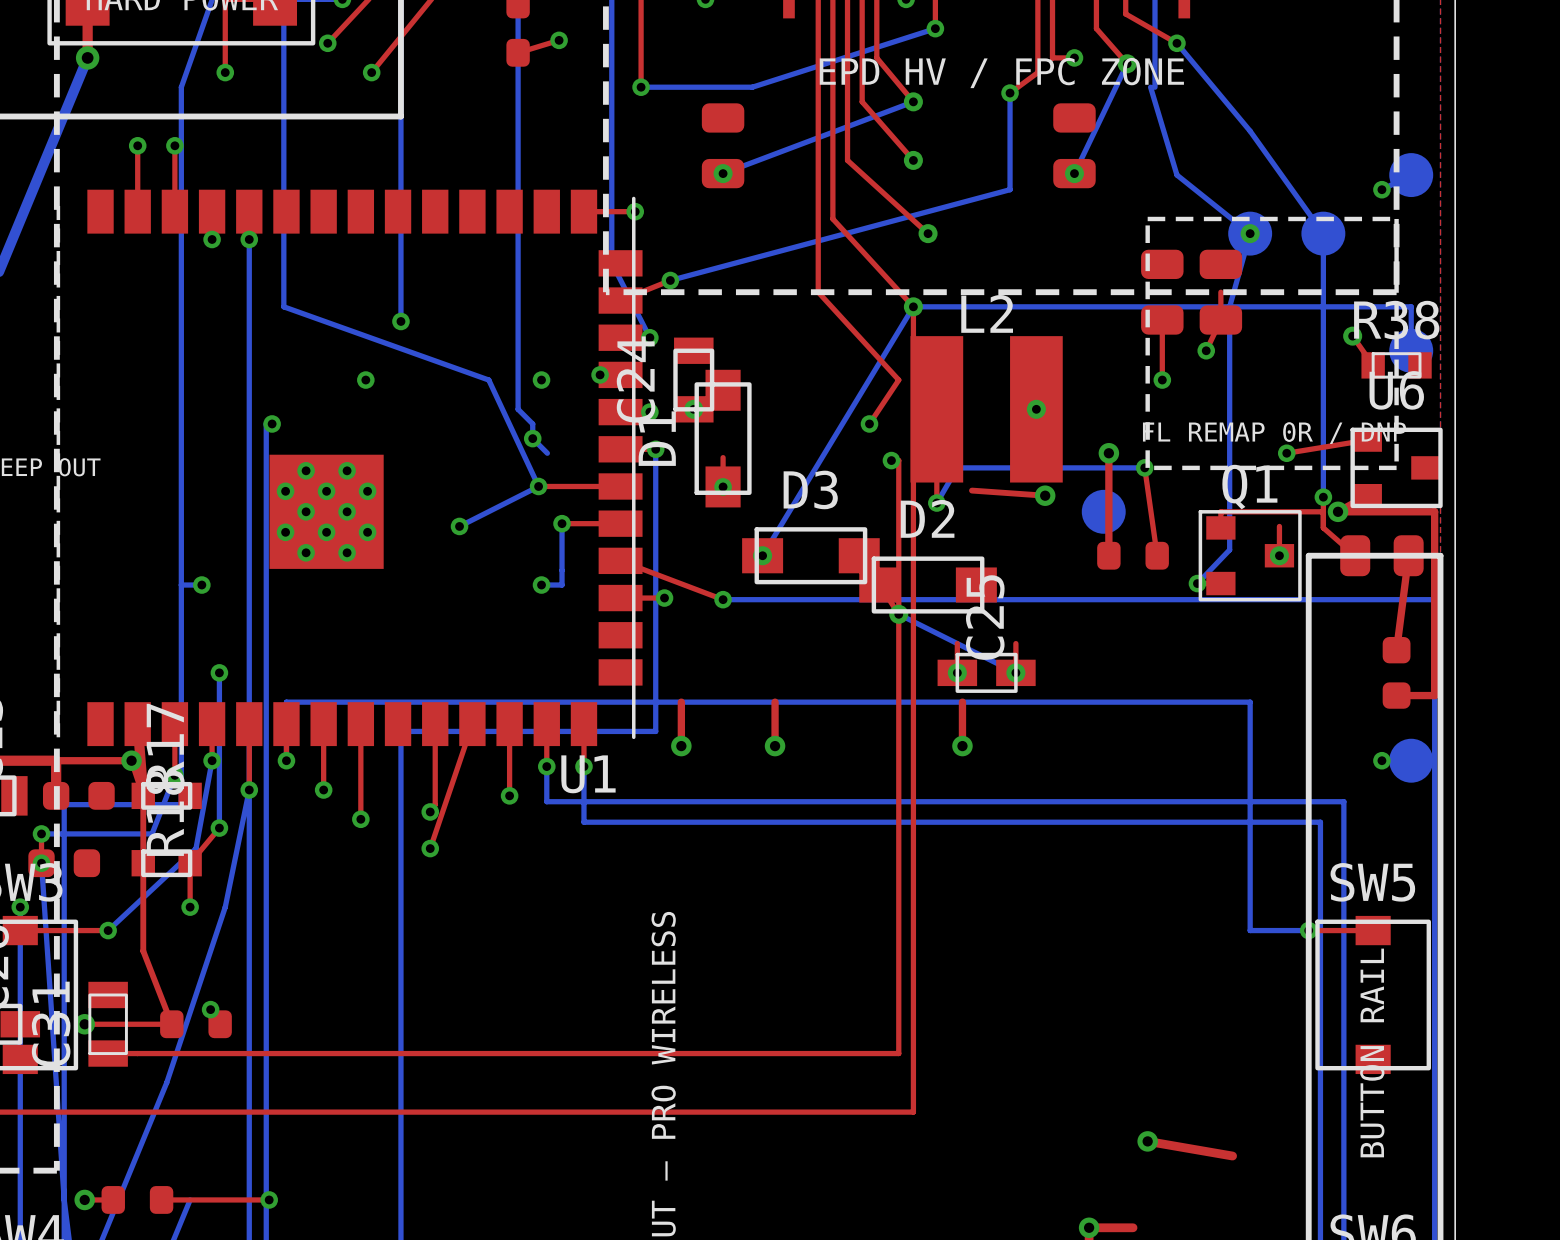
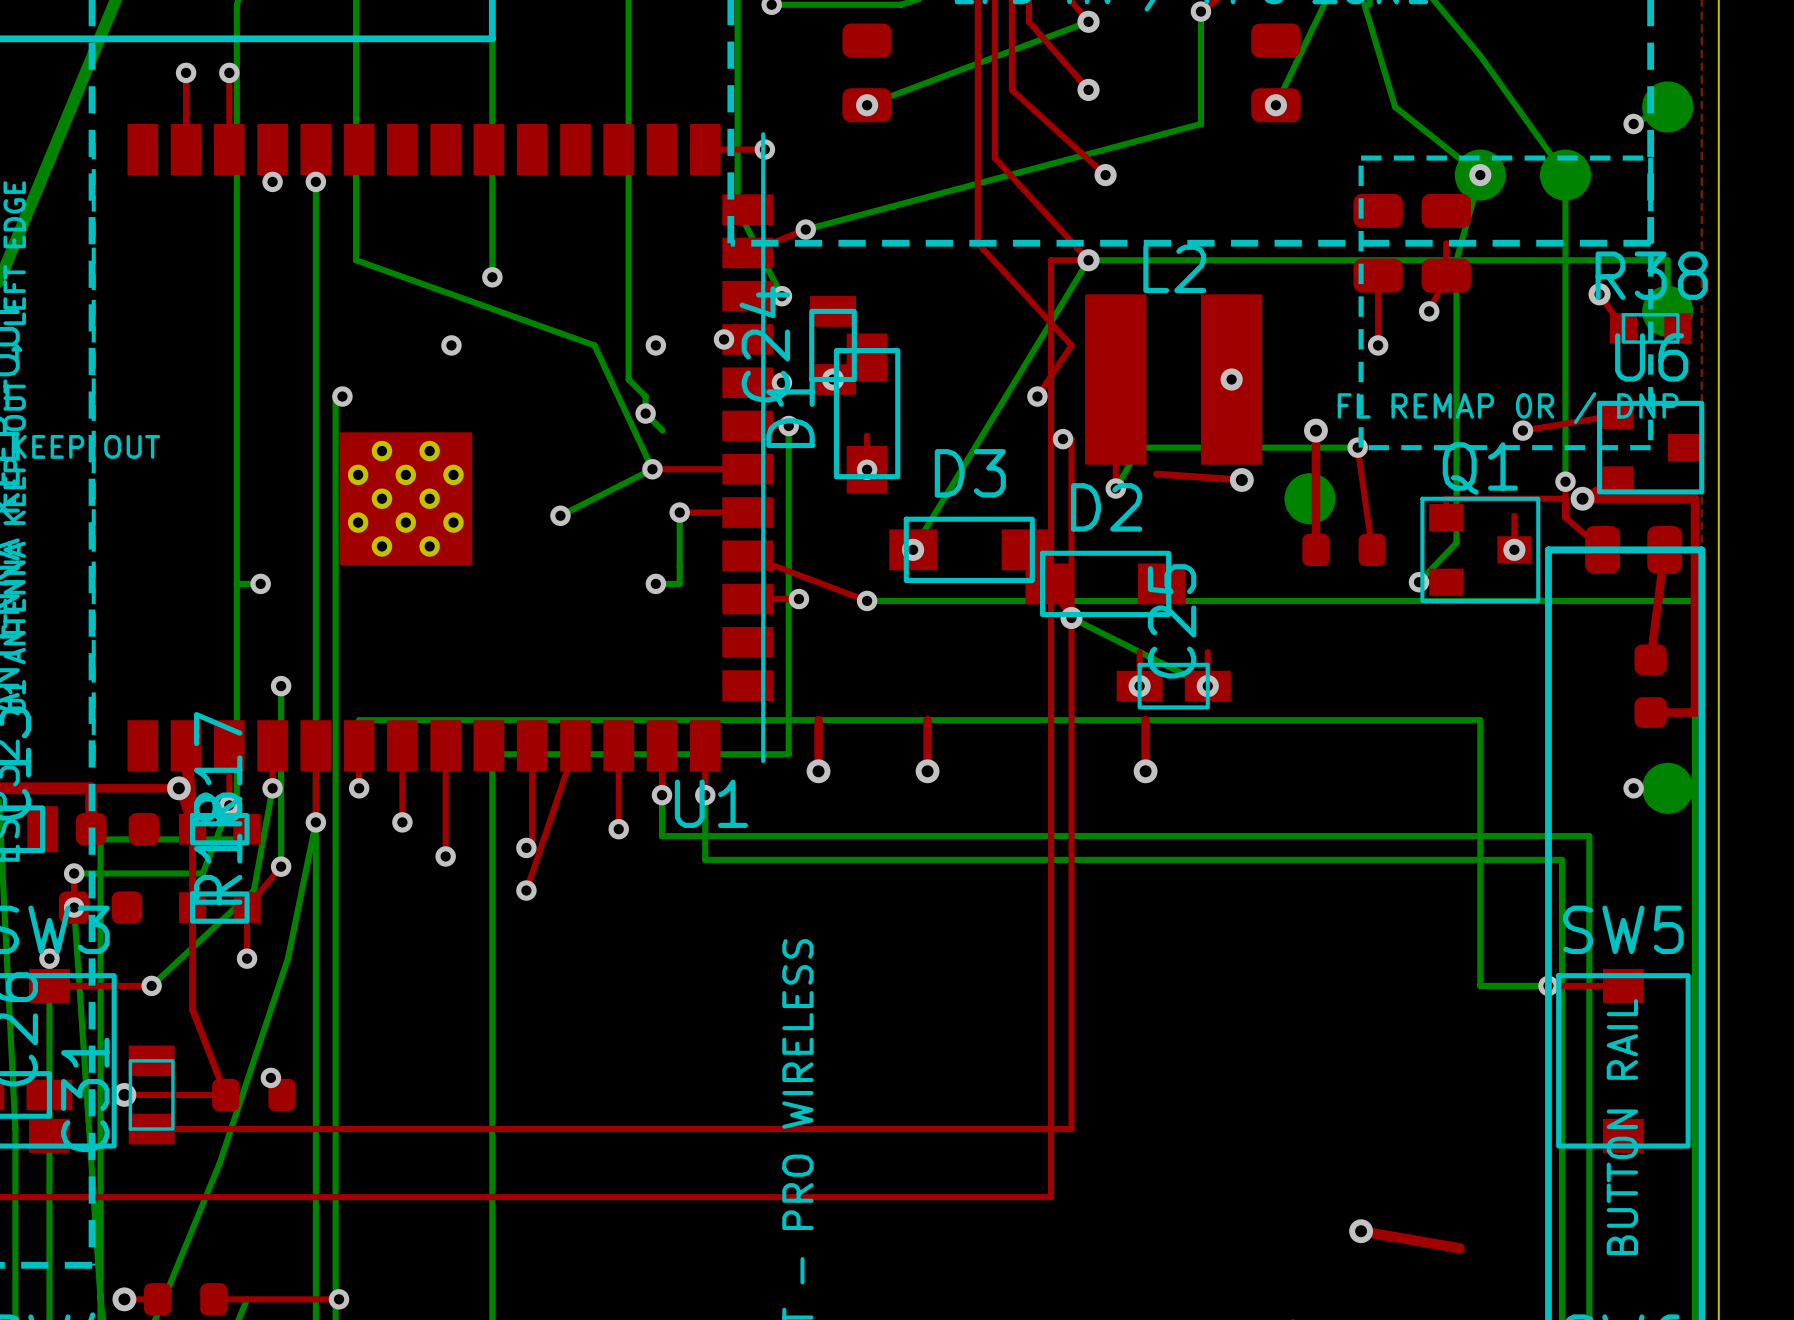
top track: (913, 306) (913, 1112) (881, 1112) -> (1088, 260) (1051, 260) (1051, 1197)

